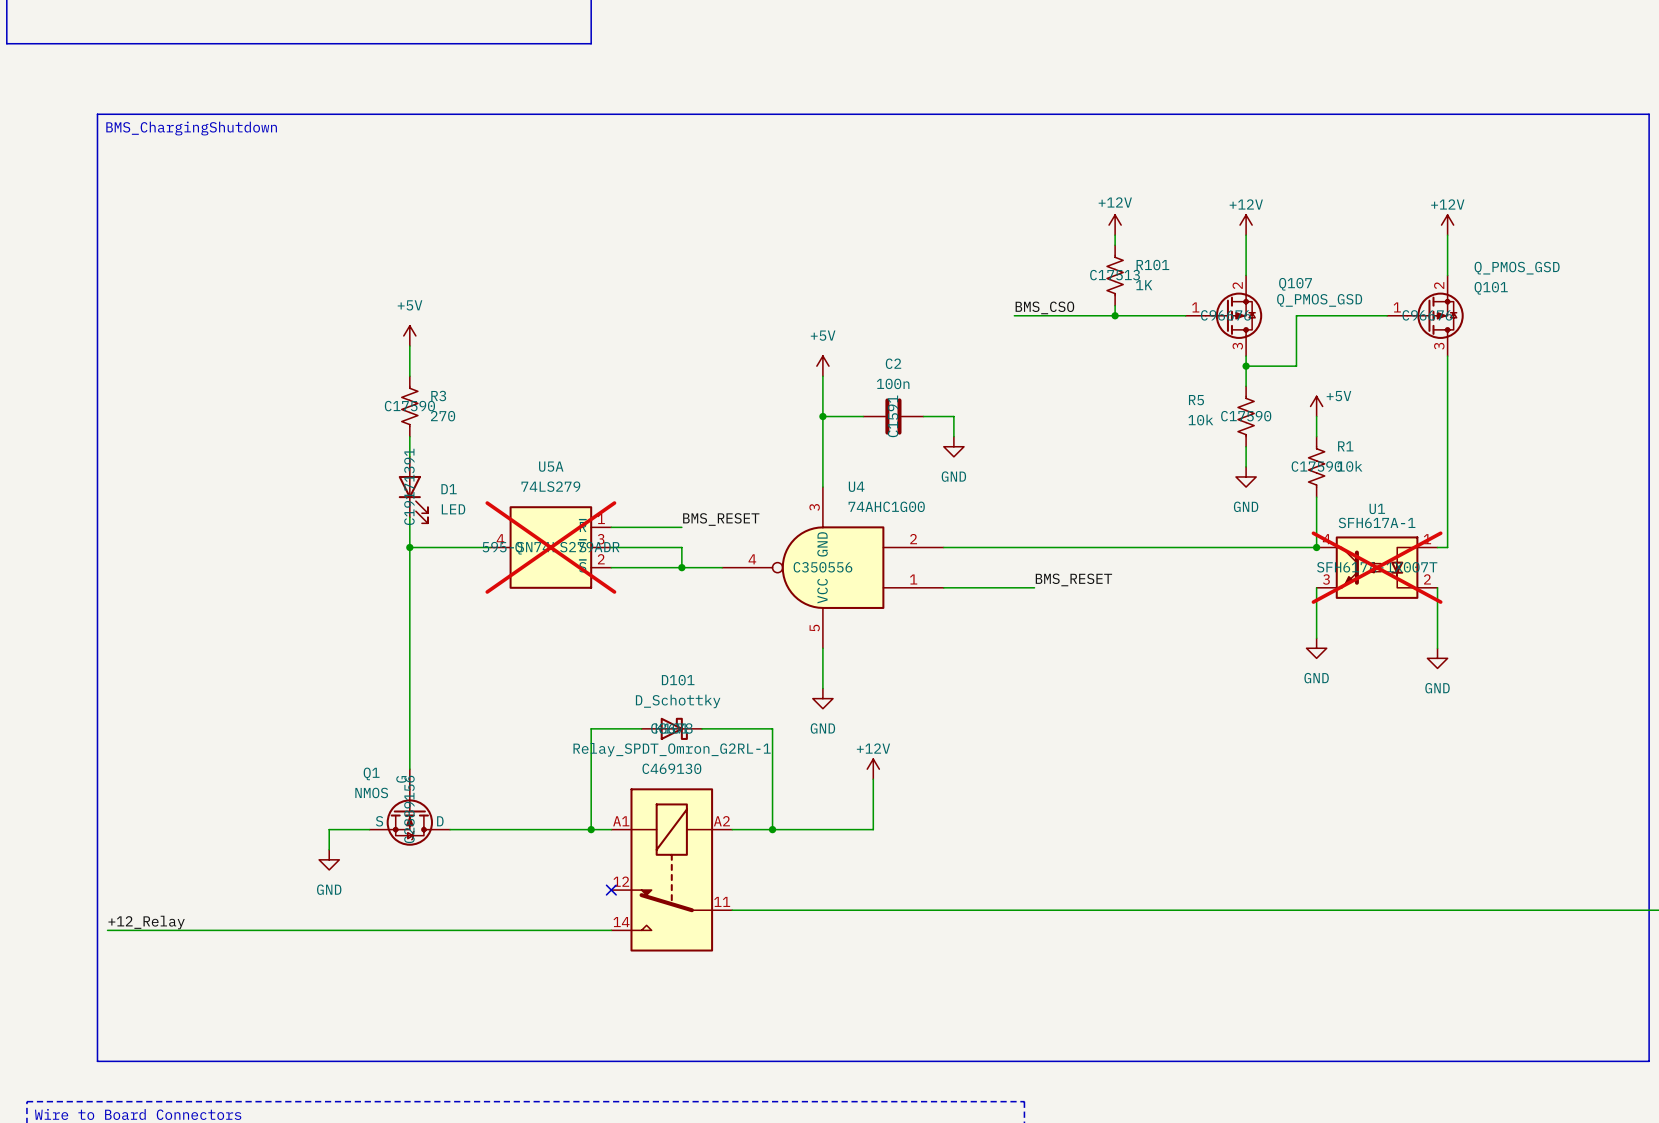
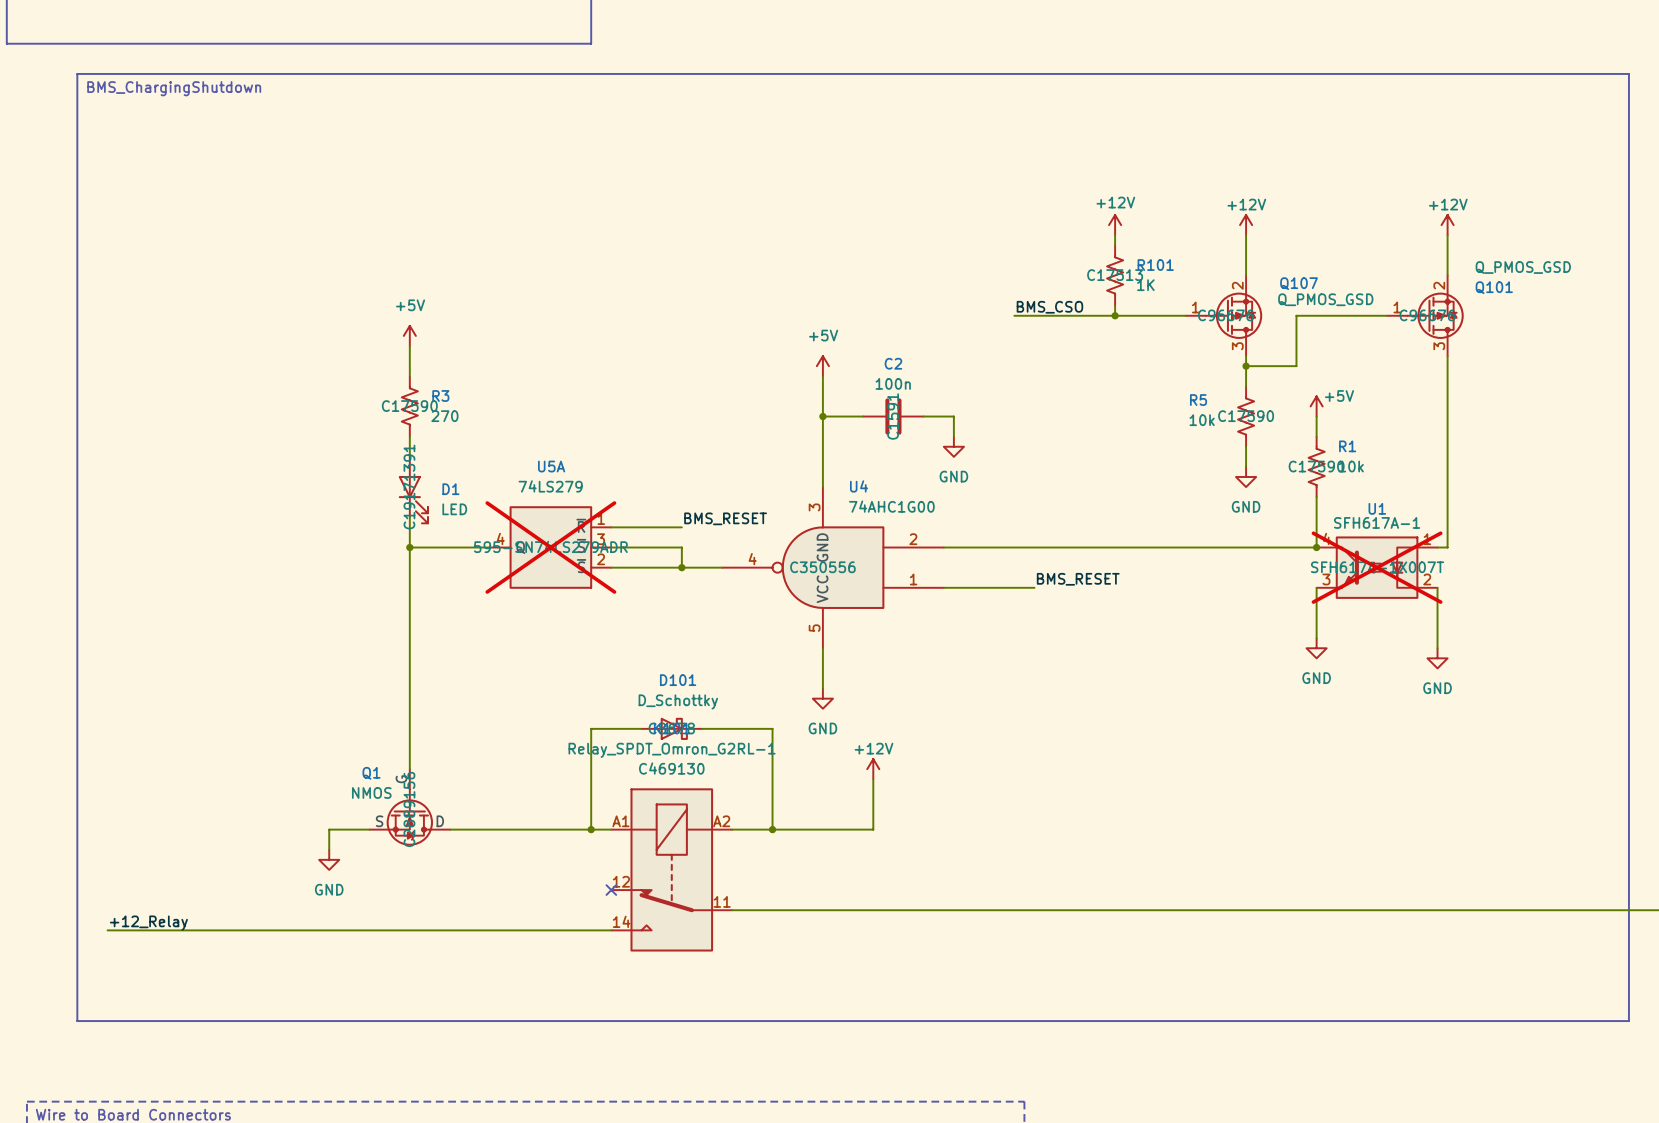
line: (97, 114) (1649, 114) (1649, 1061) (97, 1061) (97, 114) -> (77, 73) (1628, 73) (1628, 1021) (77, 1021) (77, 73)
text position: BMS_ChargingShutdown (191, 128) -> BMS_ChargingShutdown (174, 88)

